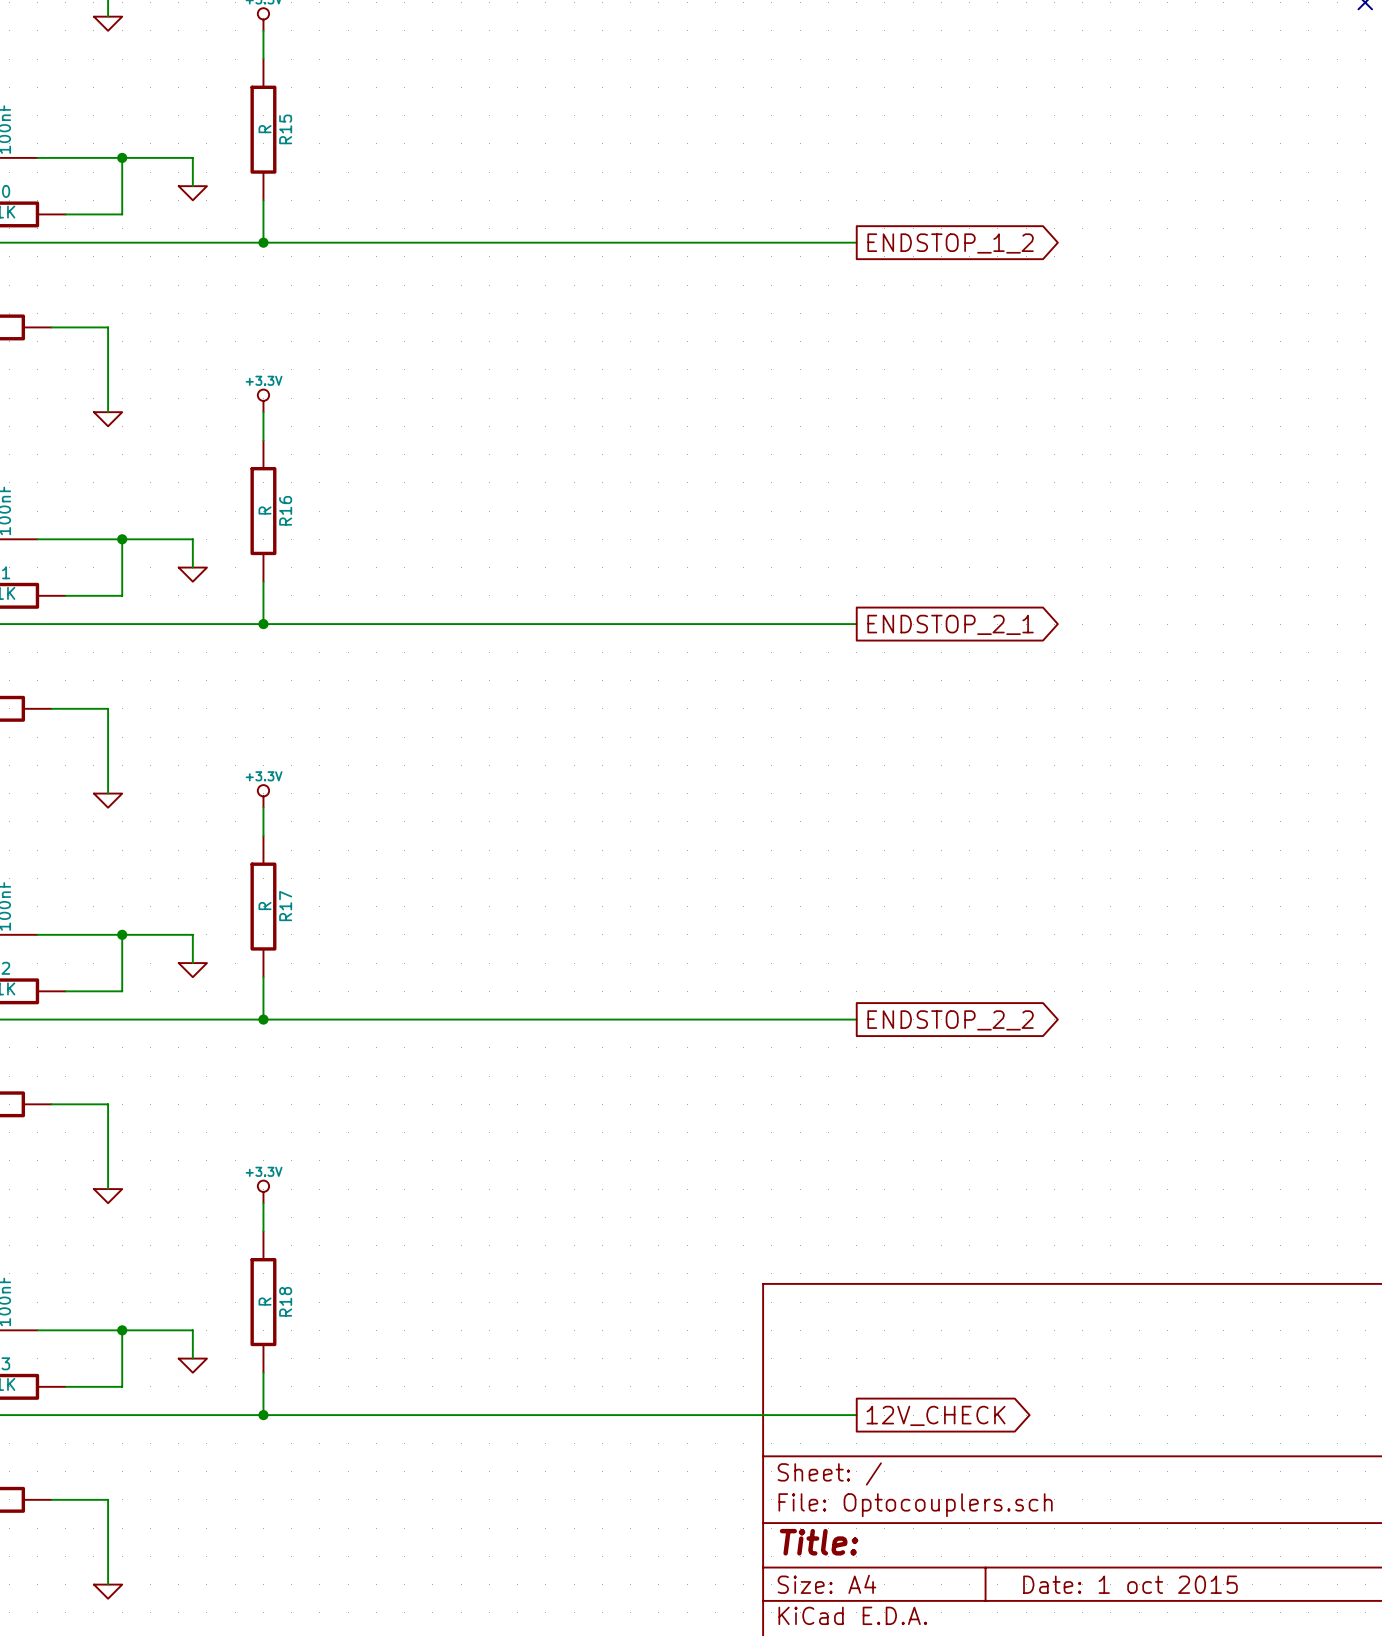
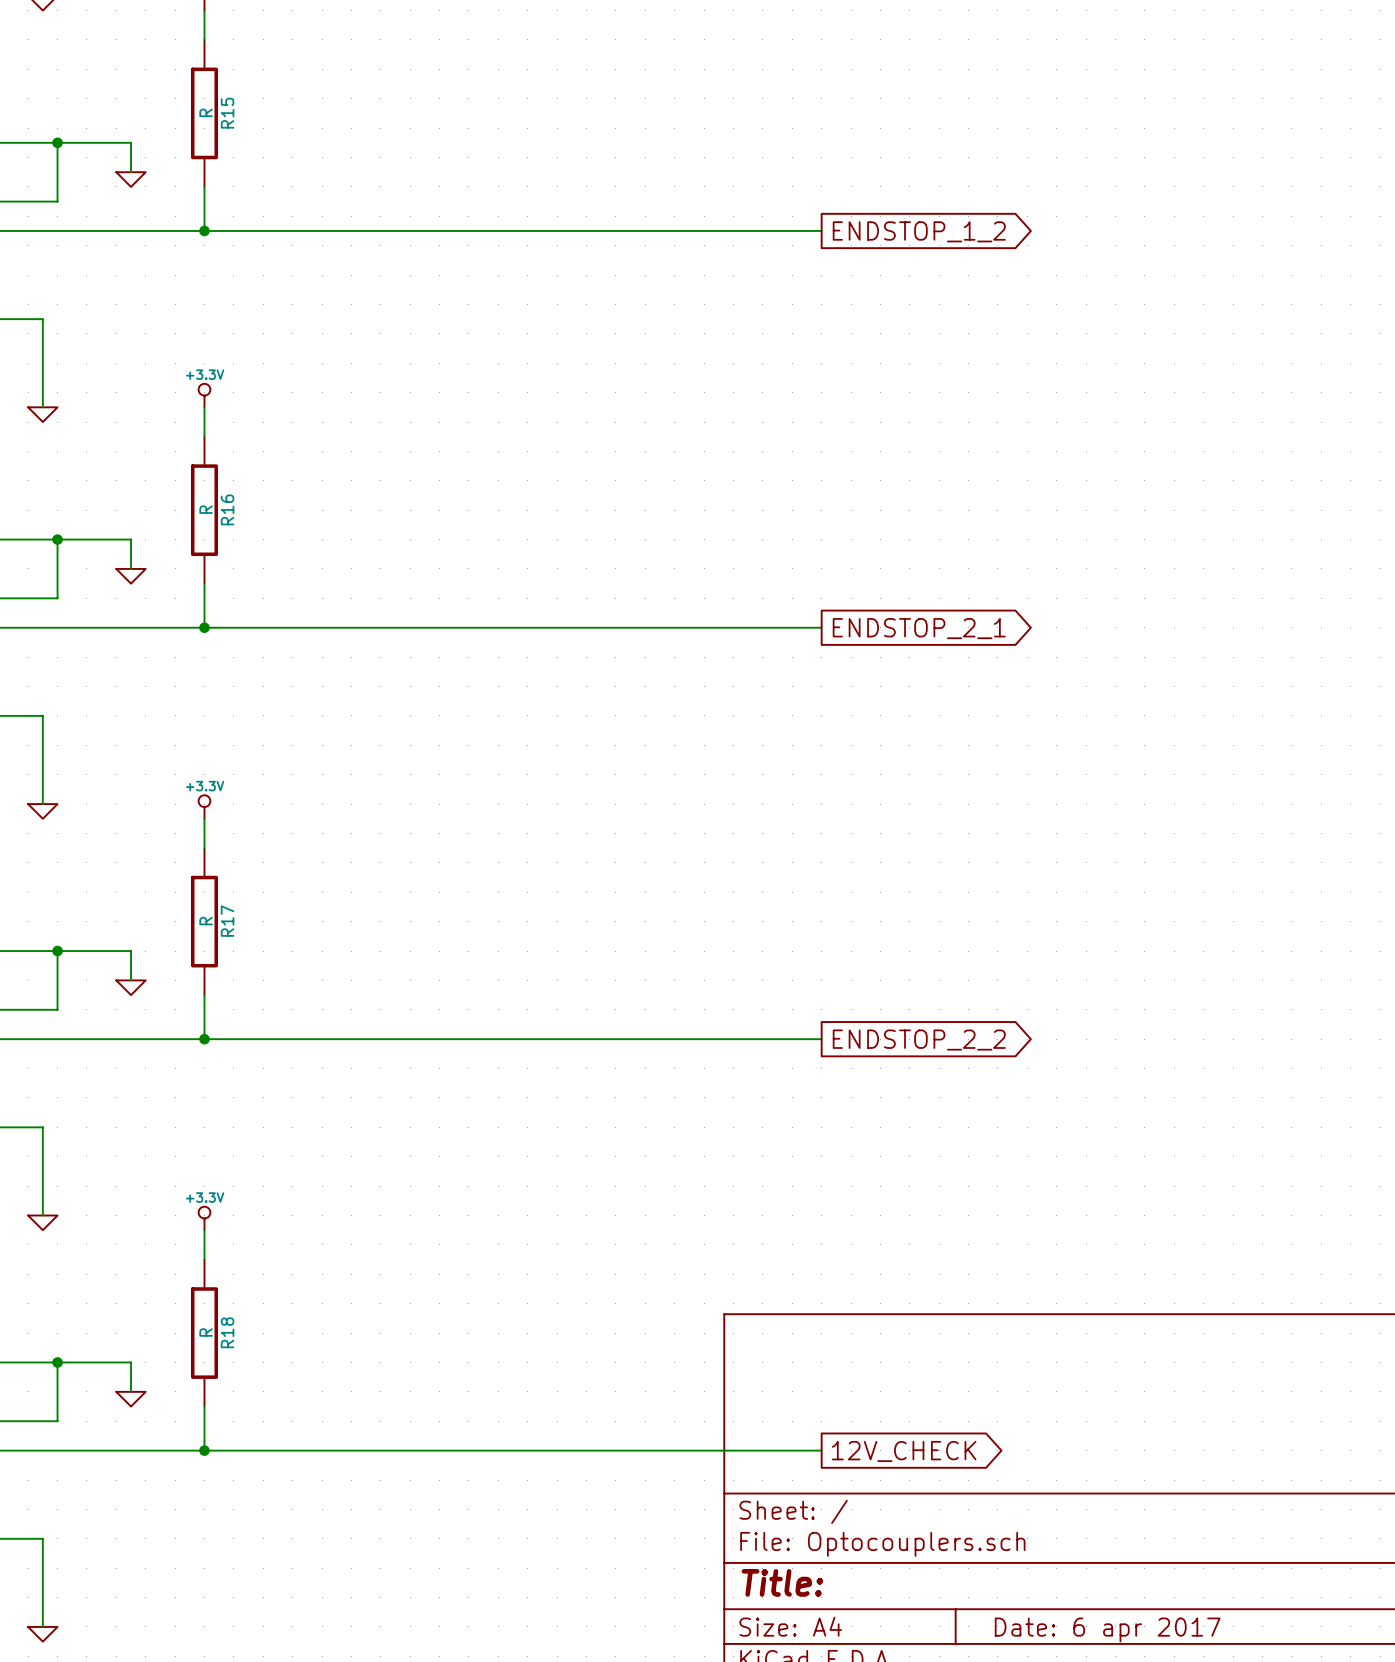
title block: Date: 1 oct 2015 (1130, 1584) -> Date: 6 apr 2017 (1107, 1629)

